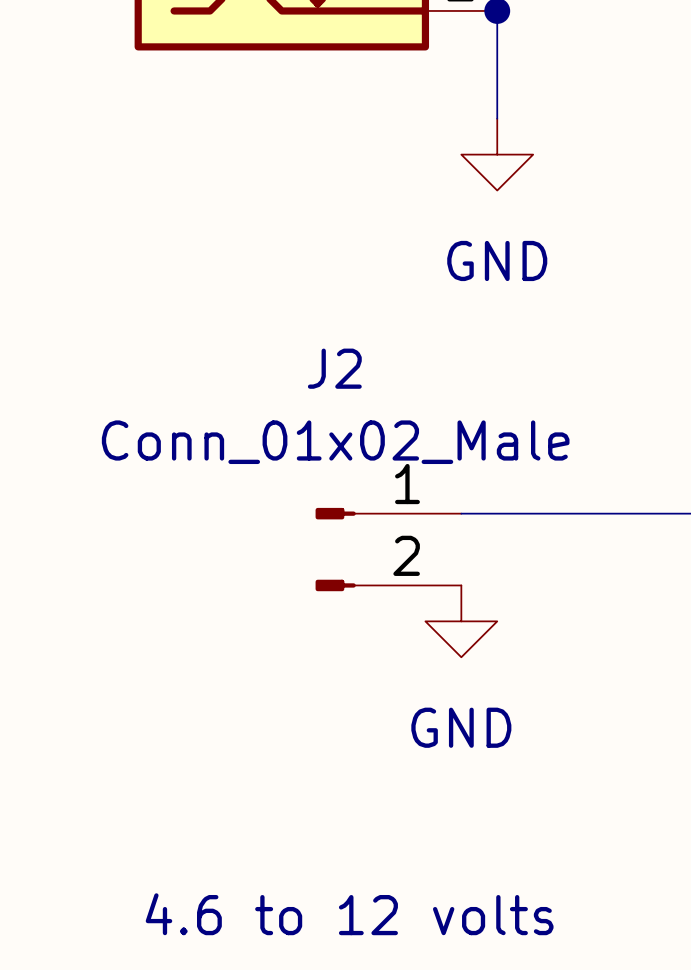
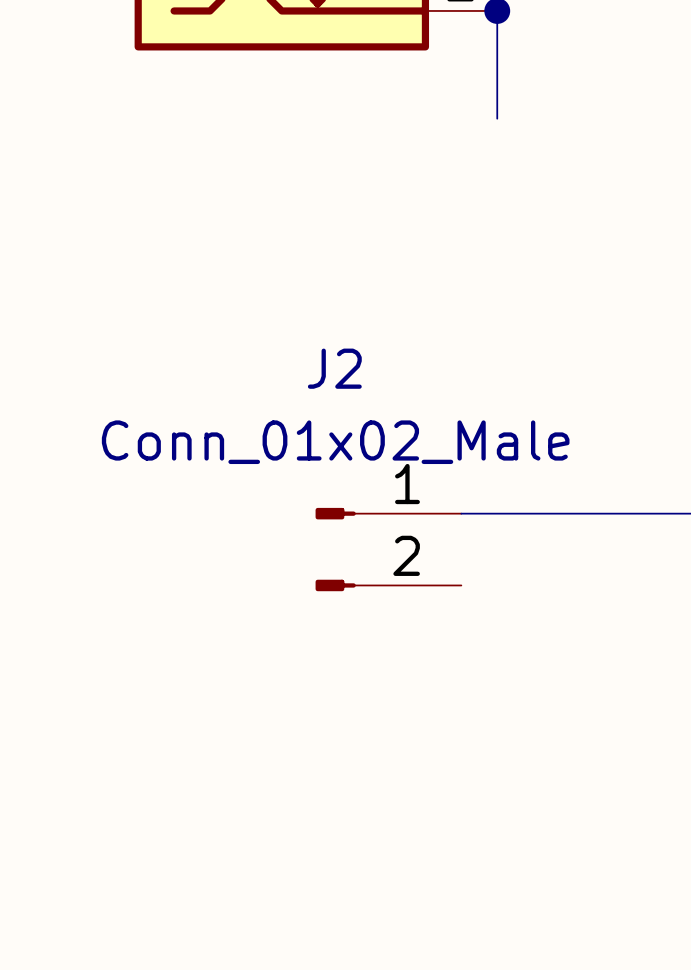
power symbol: GND (497, 154) -> none
power symbol: GND (461, 621) -> none
text: 4.6 to 12 volts (349, 914) -> none

